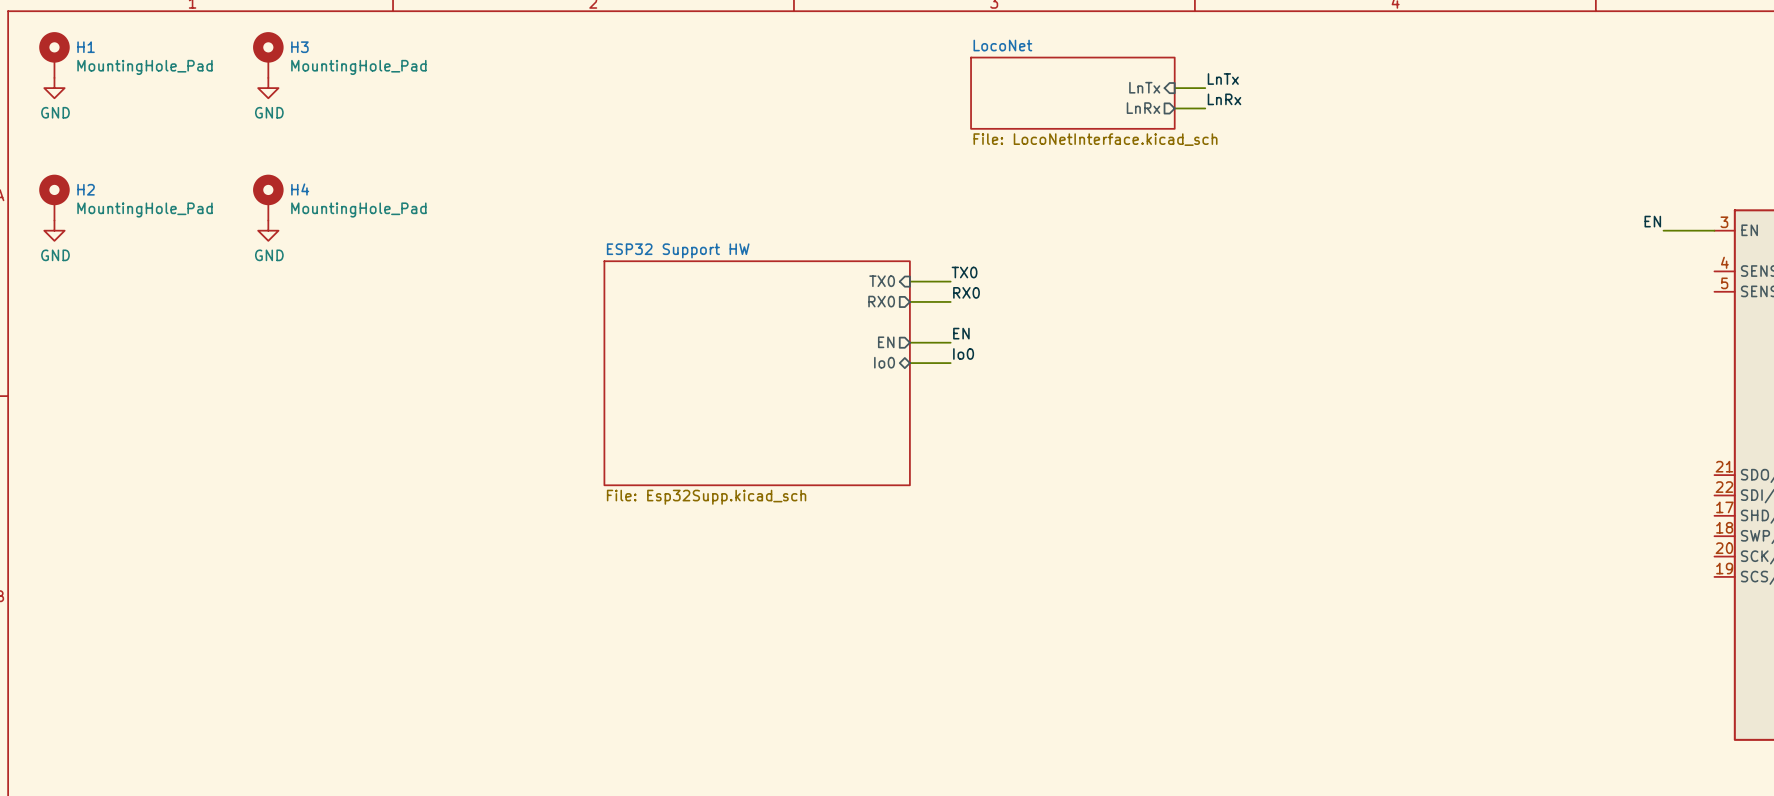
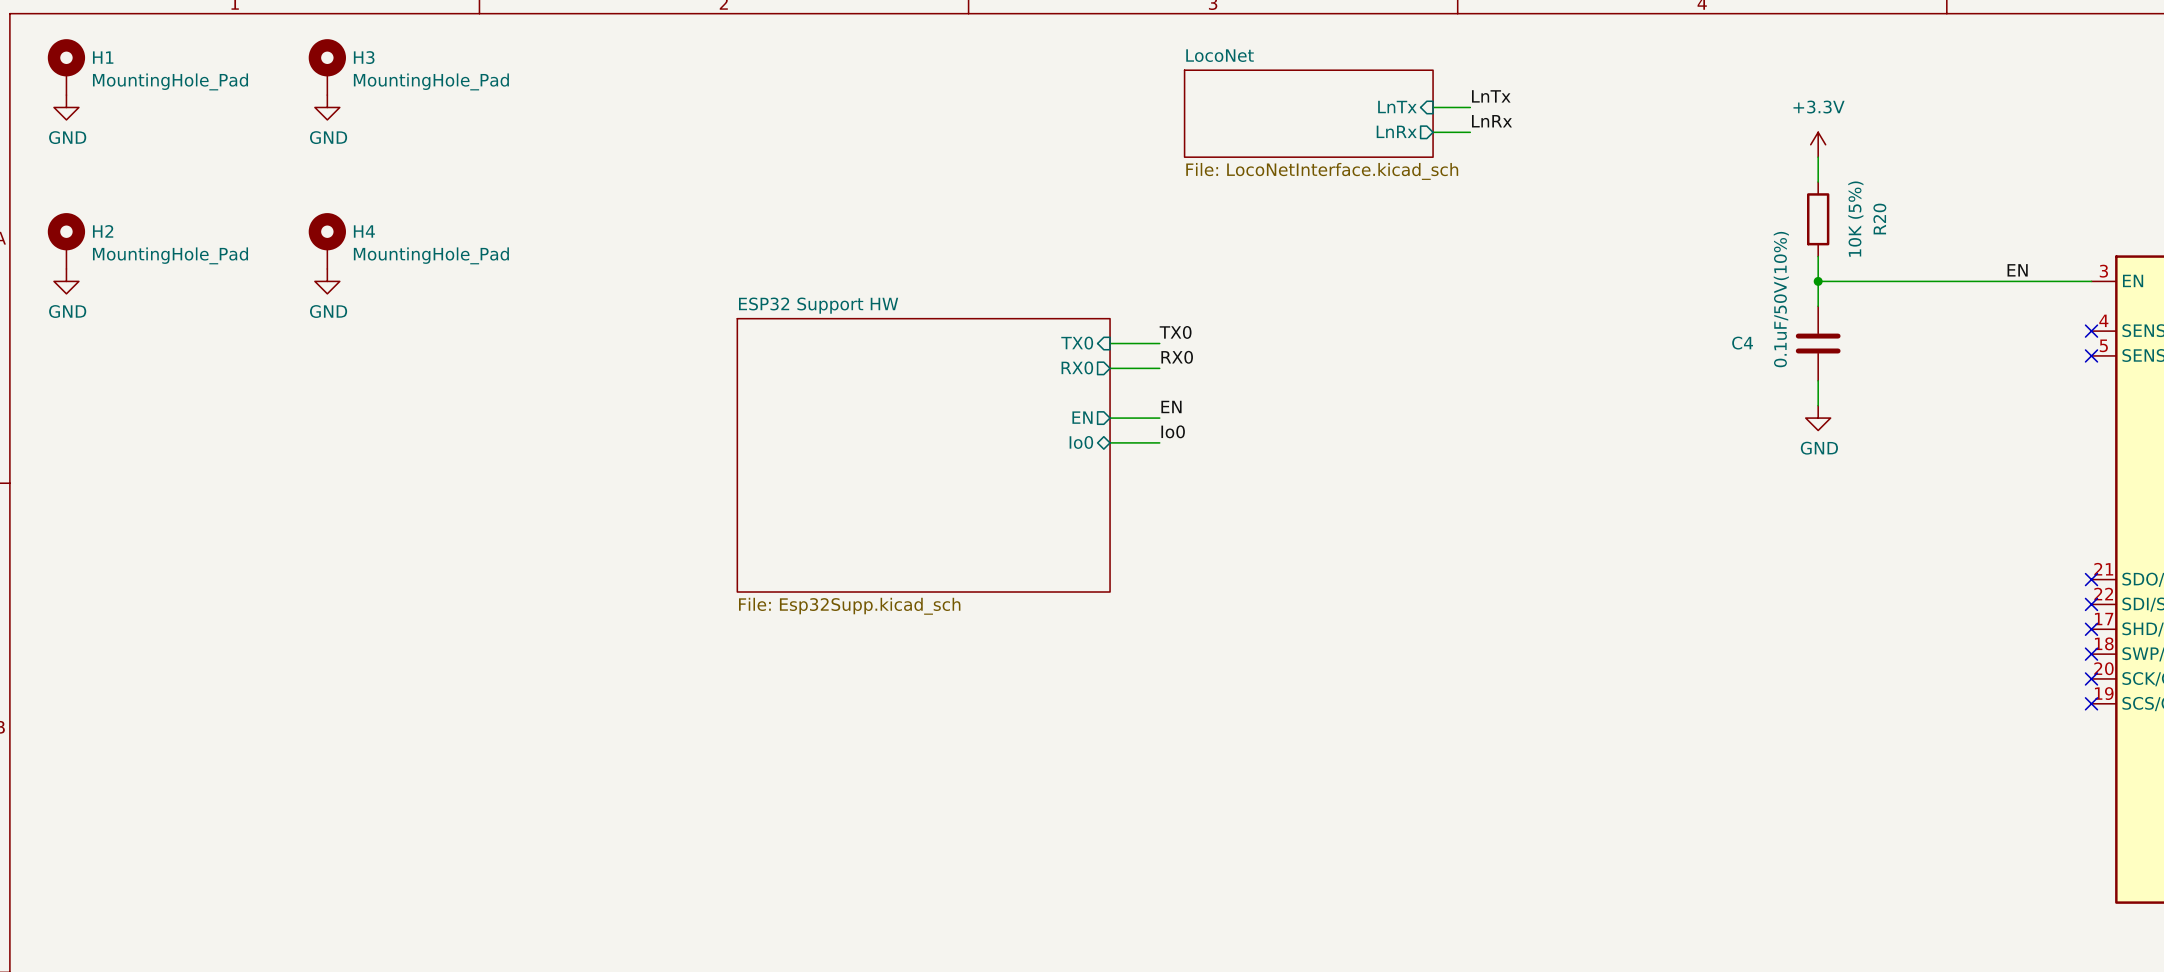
power symbol: none -> +3.3V (1818, 144)
wire: none -> (1818, 157) (1818, 182)
R20: none -> 10K (5%) (1818, 219)
wire: none -> (1818, 256) (1818, 306)
wire: none -> (1818, 281) (2029, 281)
junction: none -> (1818, 281)
no-connect mark: none -> (2091, 331)
C4: none -> 0.1uF/50V(10%) (1818, 343)
no-connect mark: none -> (2091, 355)
wire: none -> (1818, 380) (1818, 405)
power symbol: none -> GND (1818, 418)
no-connect mark: none -> (2091, 579)
no-connect mark: none -> (2091, 604)
no-connect mark: none -> (2091, 629)
no-connect mark: none -> (2091, 654)
no-connect mark: none -> (2091, 678)
no-connect mark: none -> (2091, 703)

